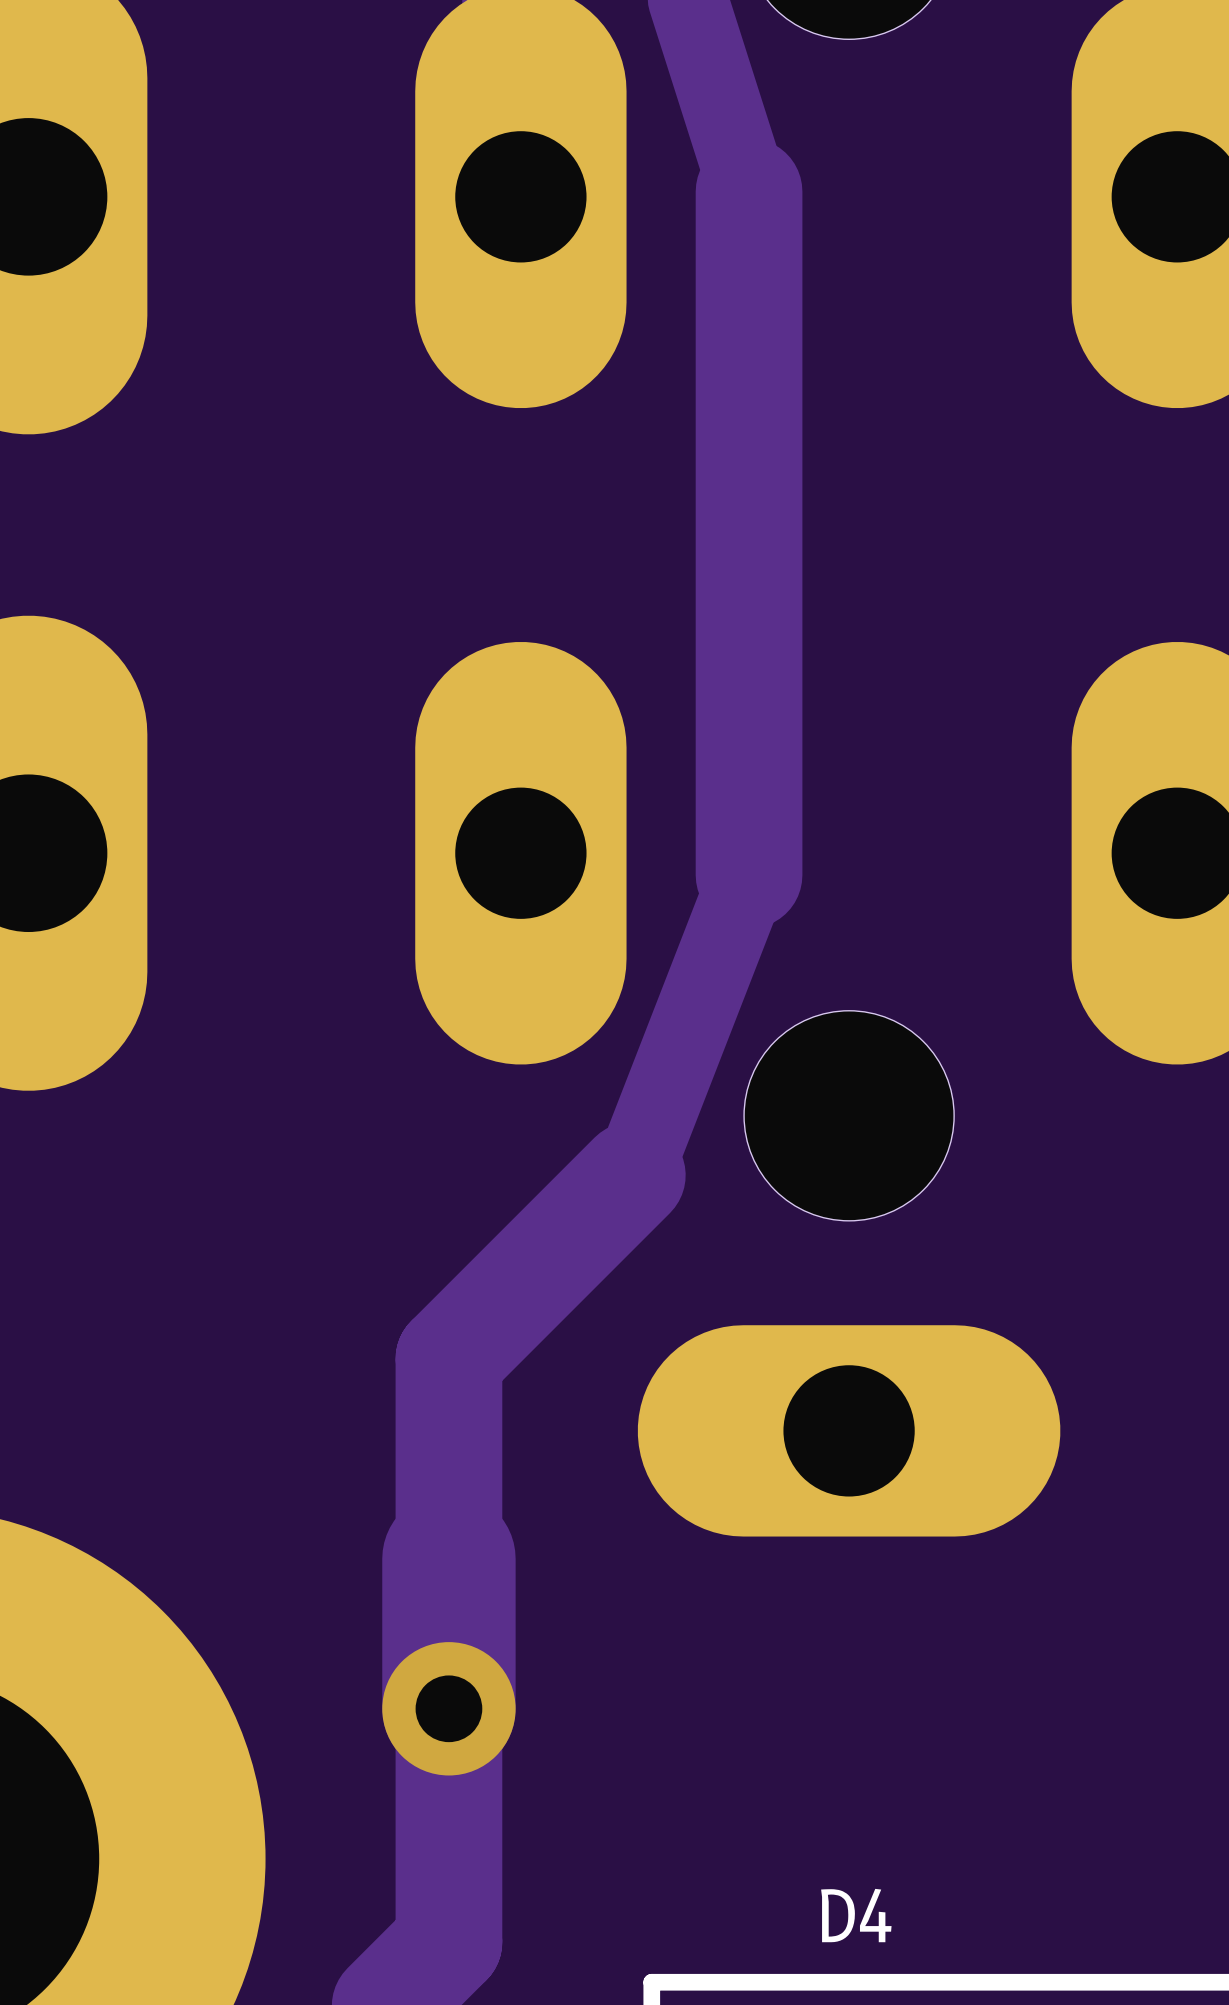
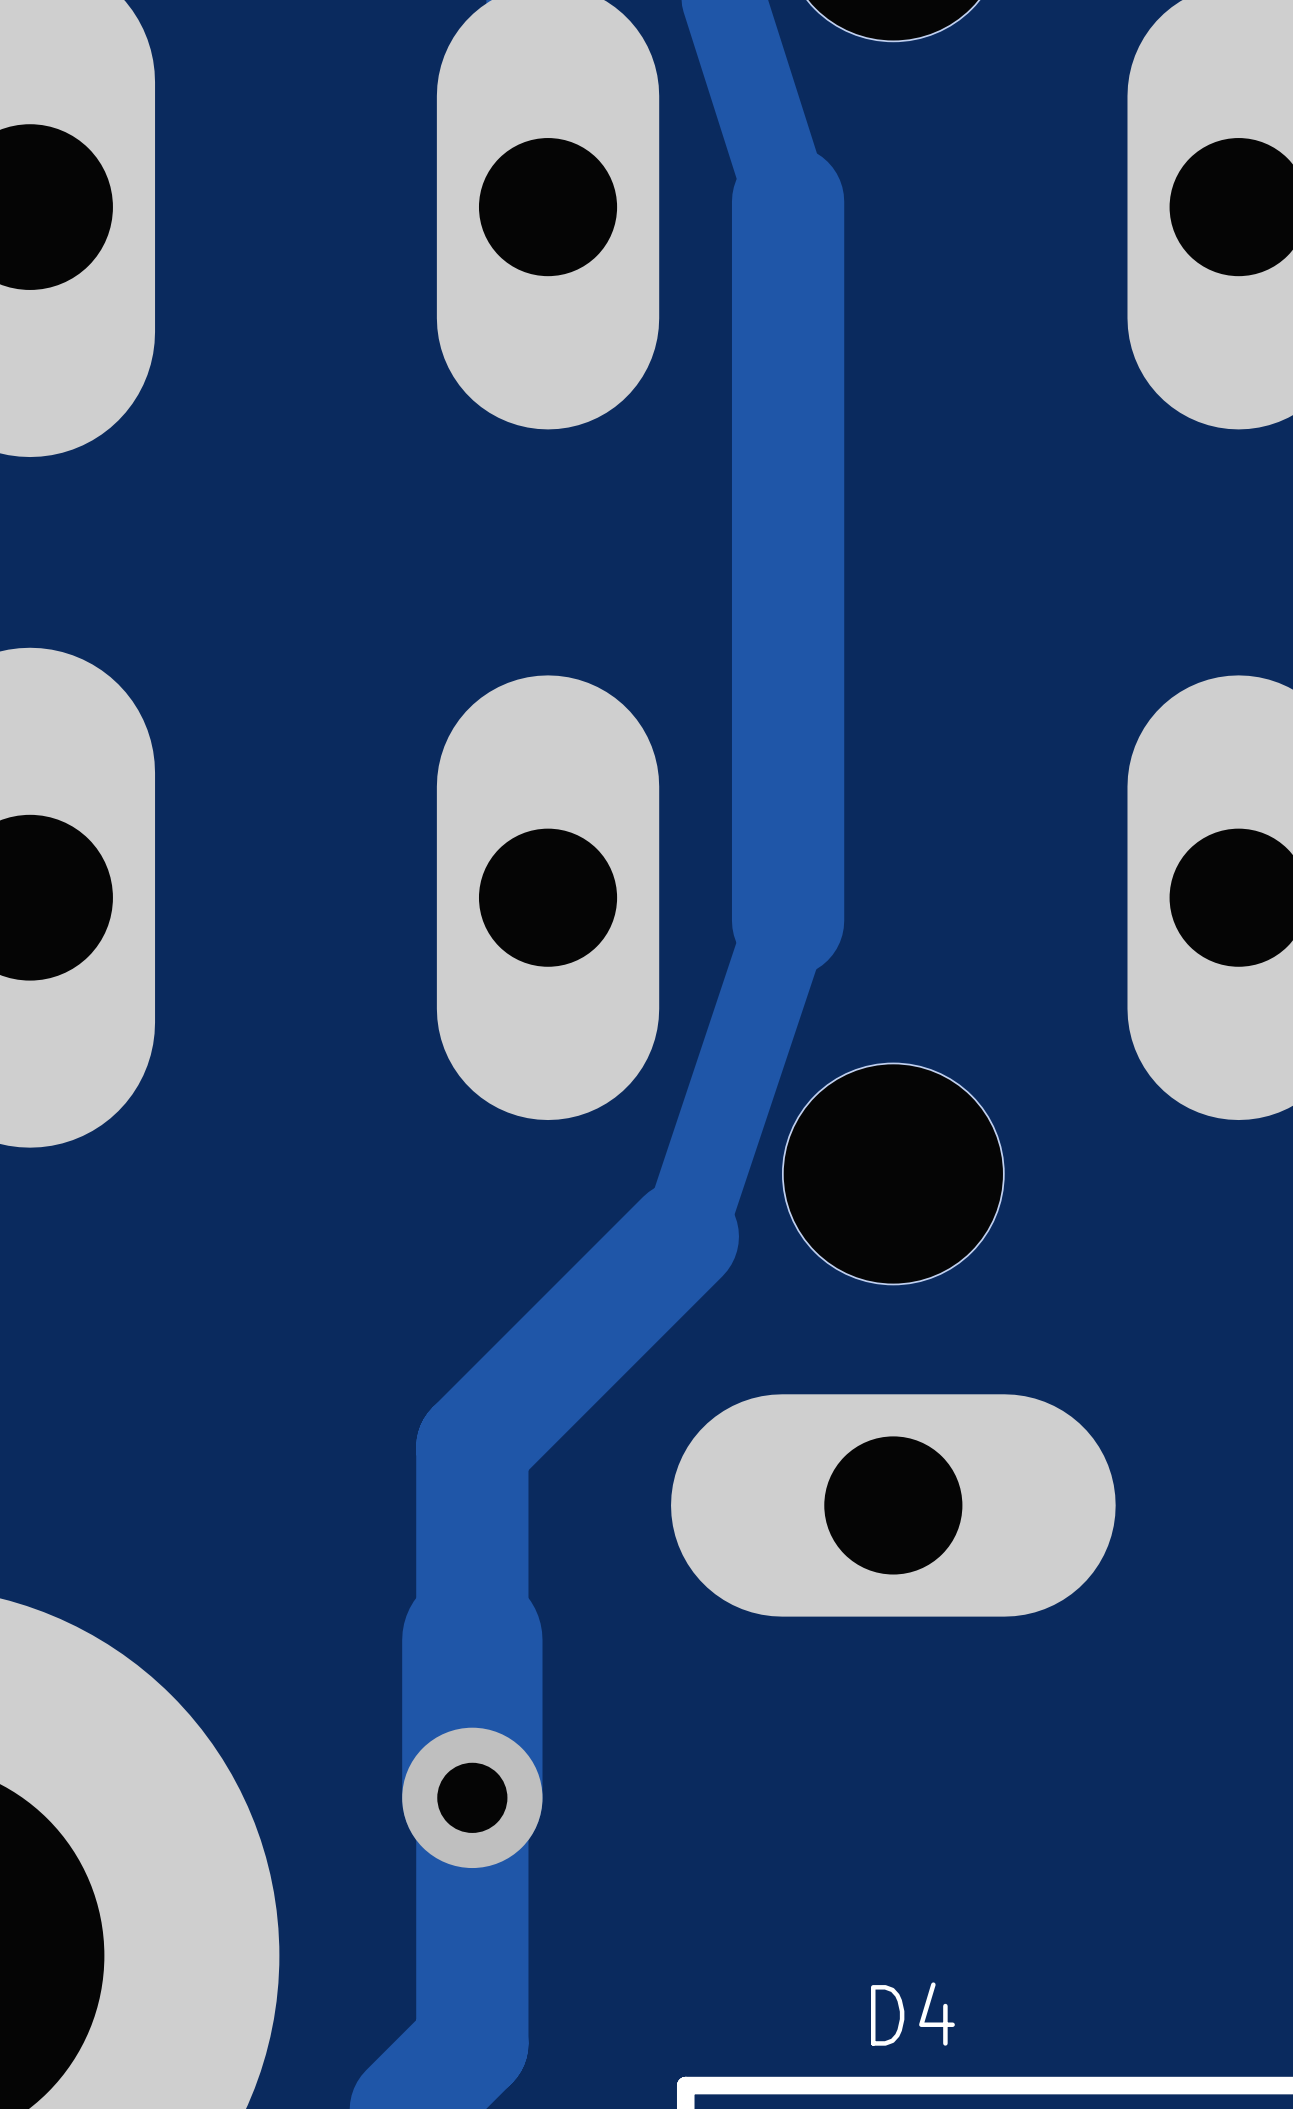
track: (749, 875) (632, 1175) (448, 1358) (448, 1375) -> (788, 920) (682, 1236) (472, 1447)

